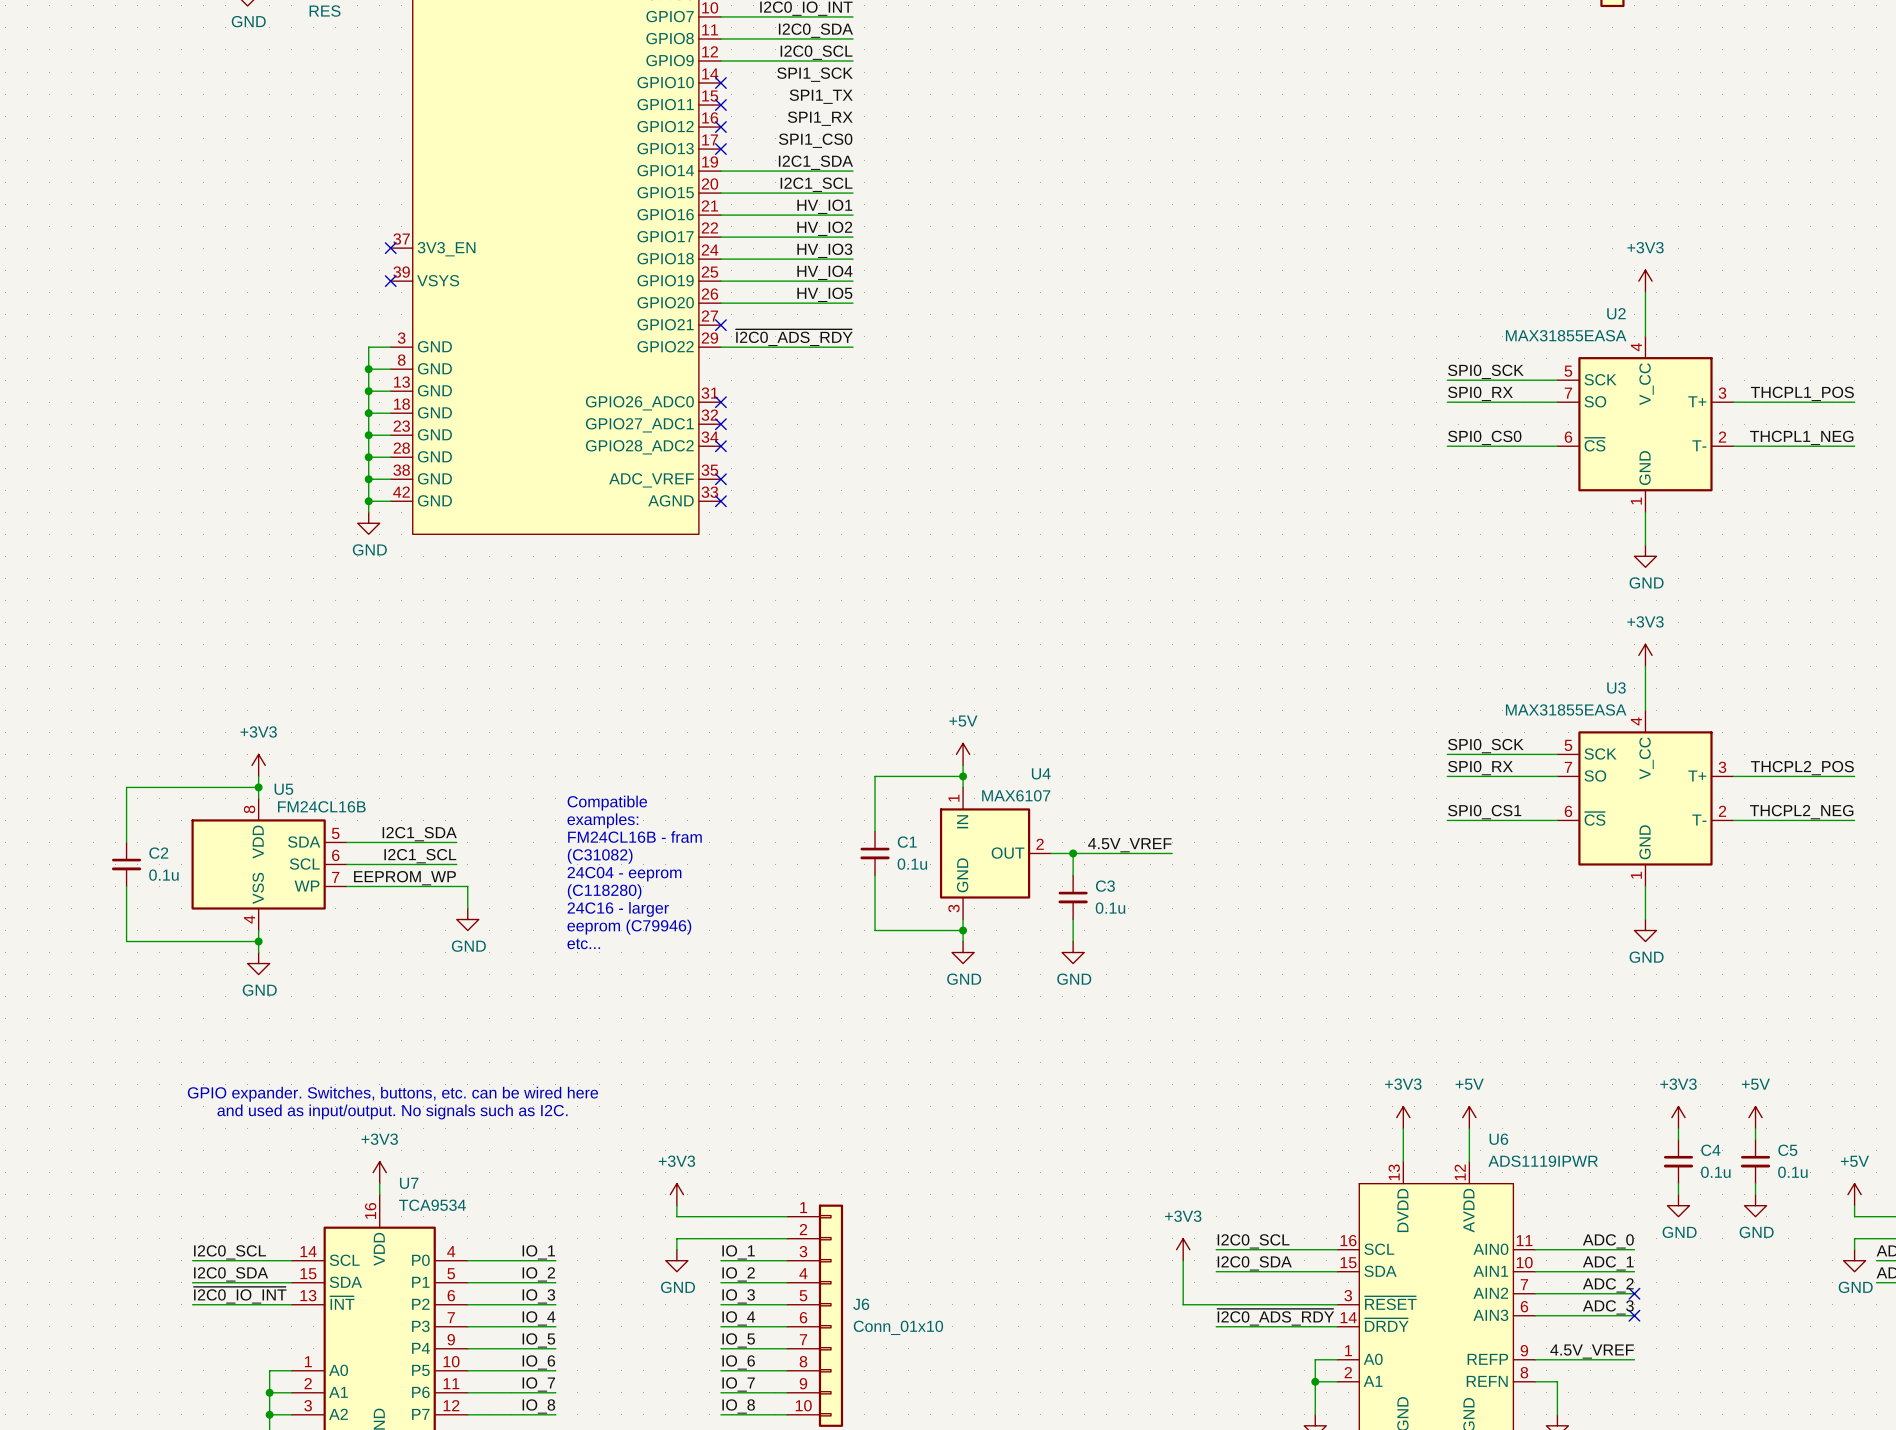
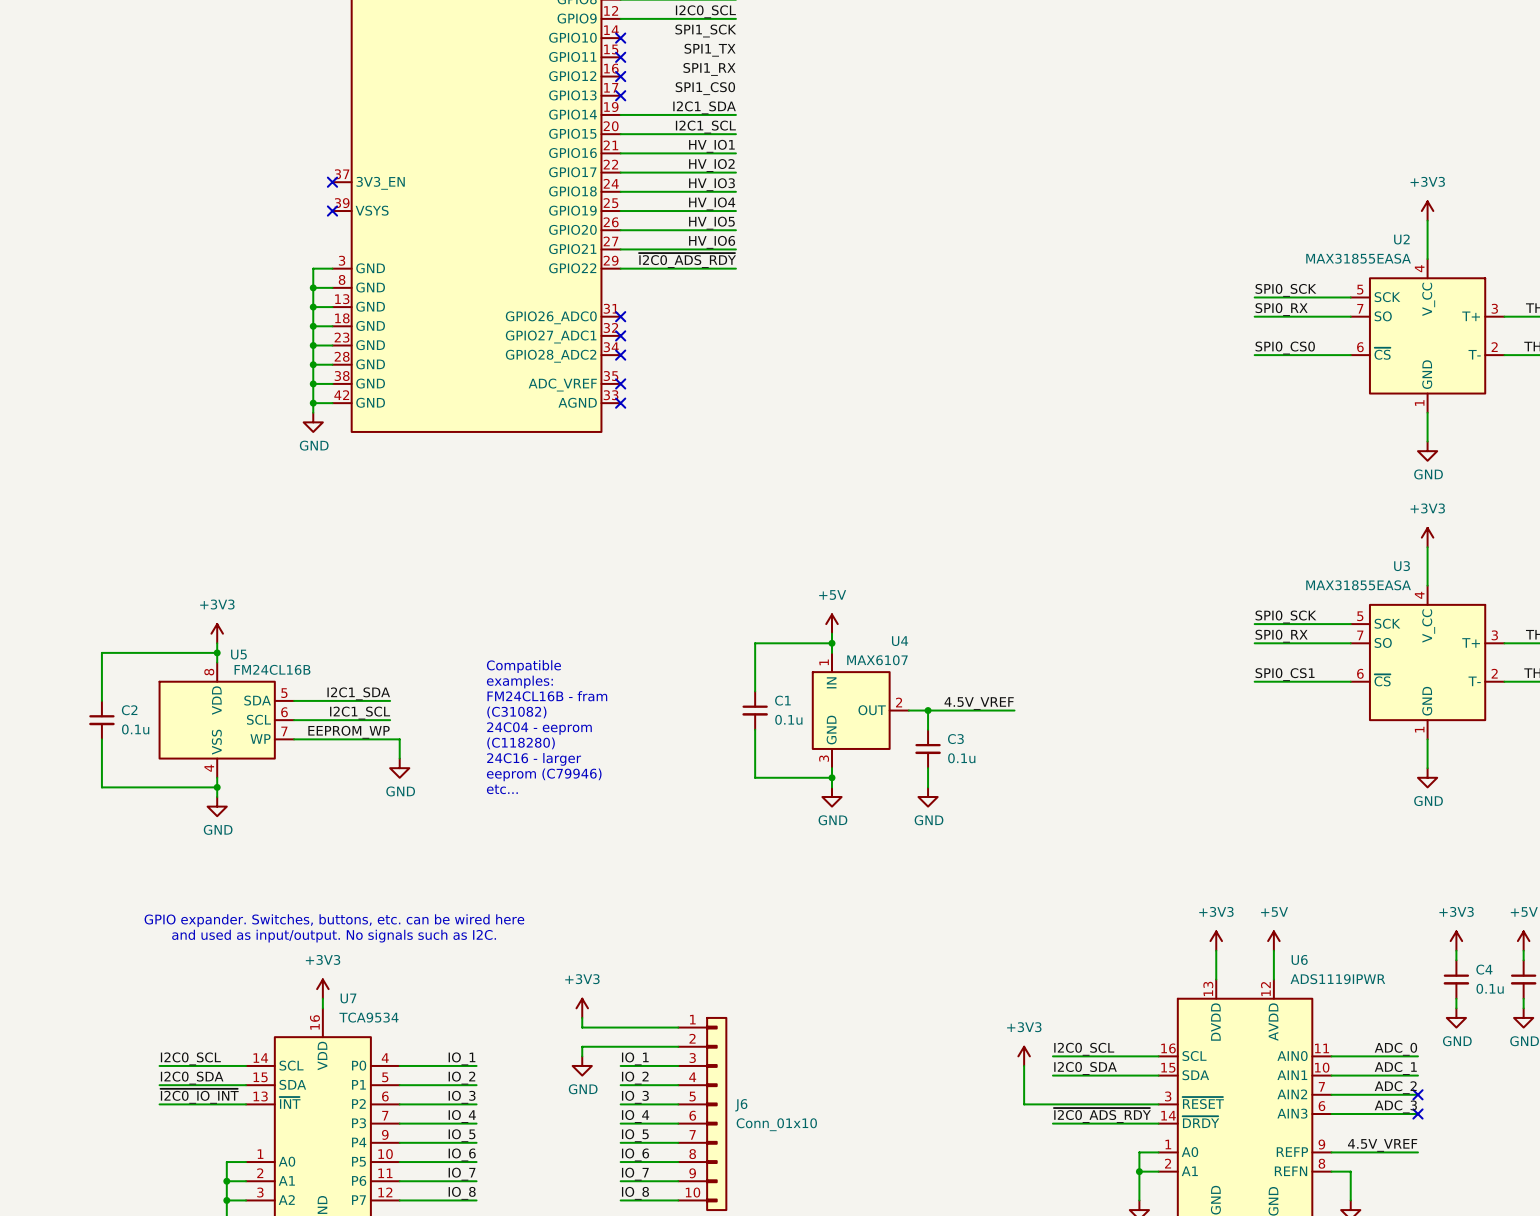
label: none -> HV_IO6 (712, 242)
wire: none -> (620, 249) (735, 249)
no-connect mark: (720, 325) -> none

